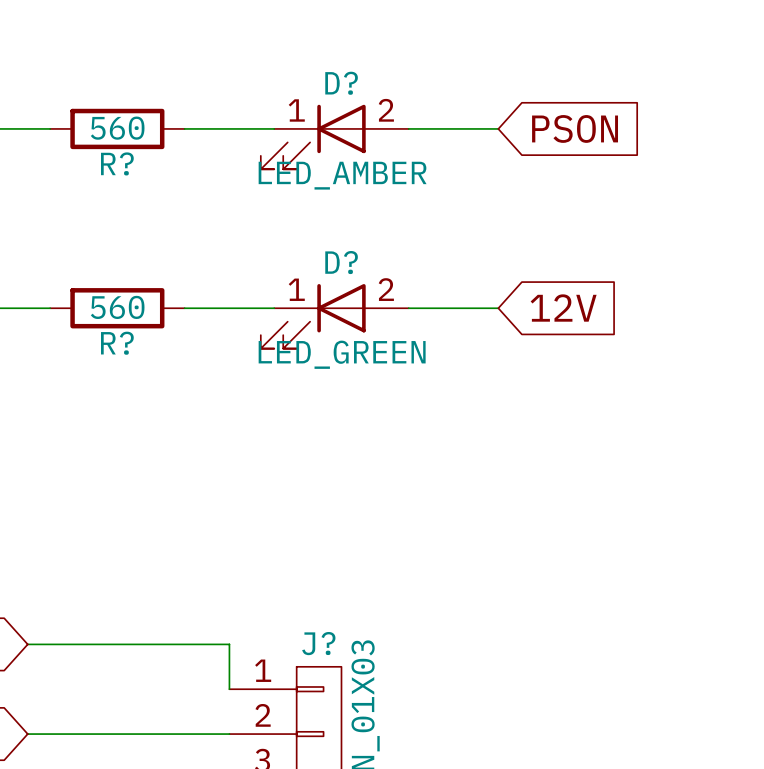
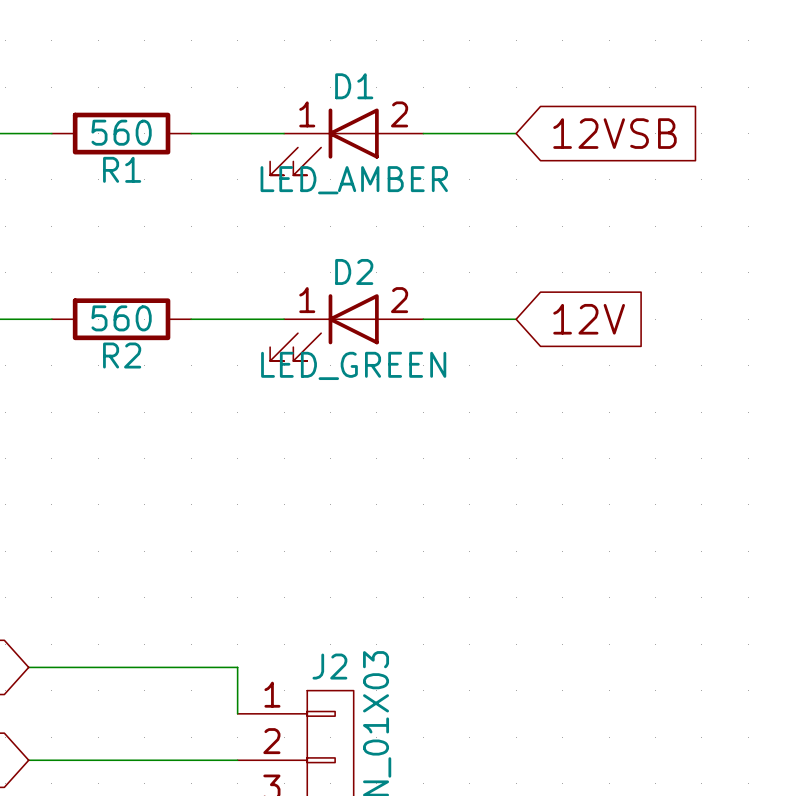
D? name: D? (341, 83) -> D1 (354, 86)
global label: PSON (575, 128) -> 12VSB (614, 133)
R? name: R? (117, 163) -> R1 (122, 169)
D? name: D? (341, 262) -> D2 (354, 271)
R? name: R? (117, 343) -> R2 (122, 355)
J? name: J? (318, 643) -> J2 (329, 666)

